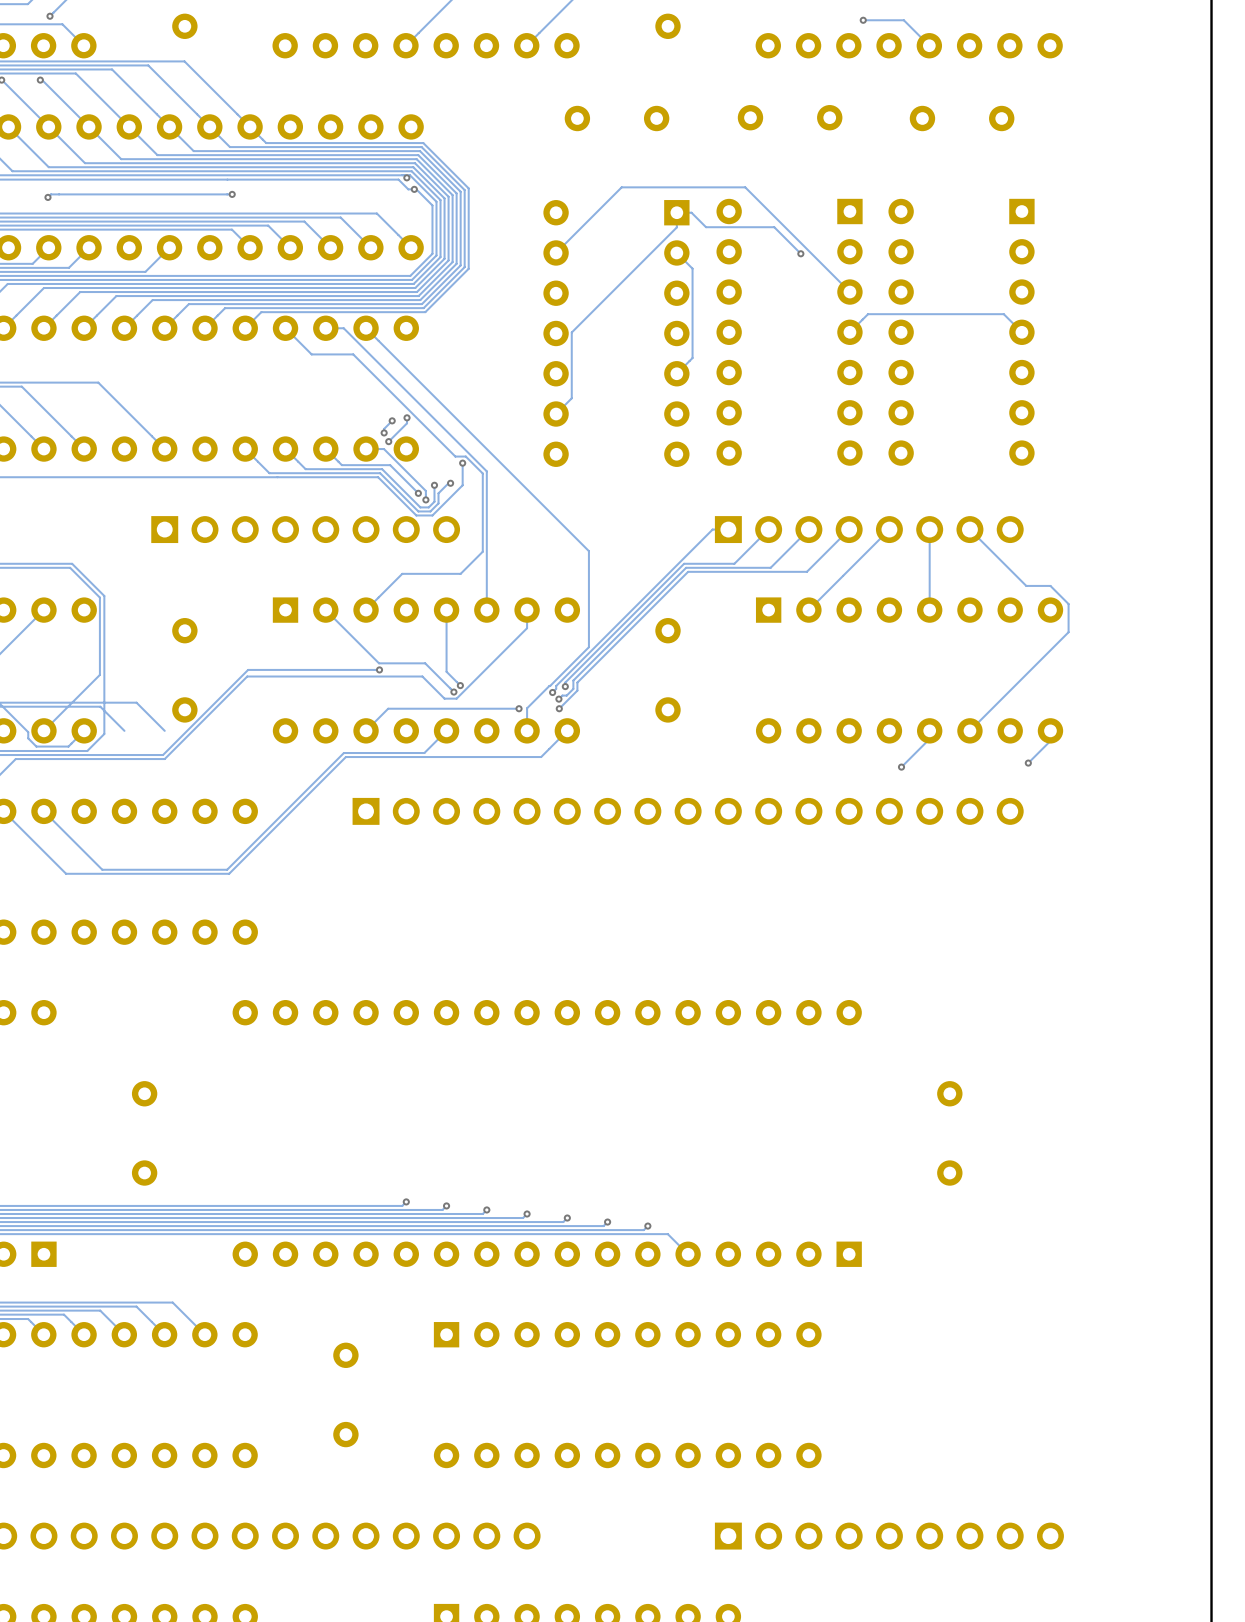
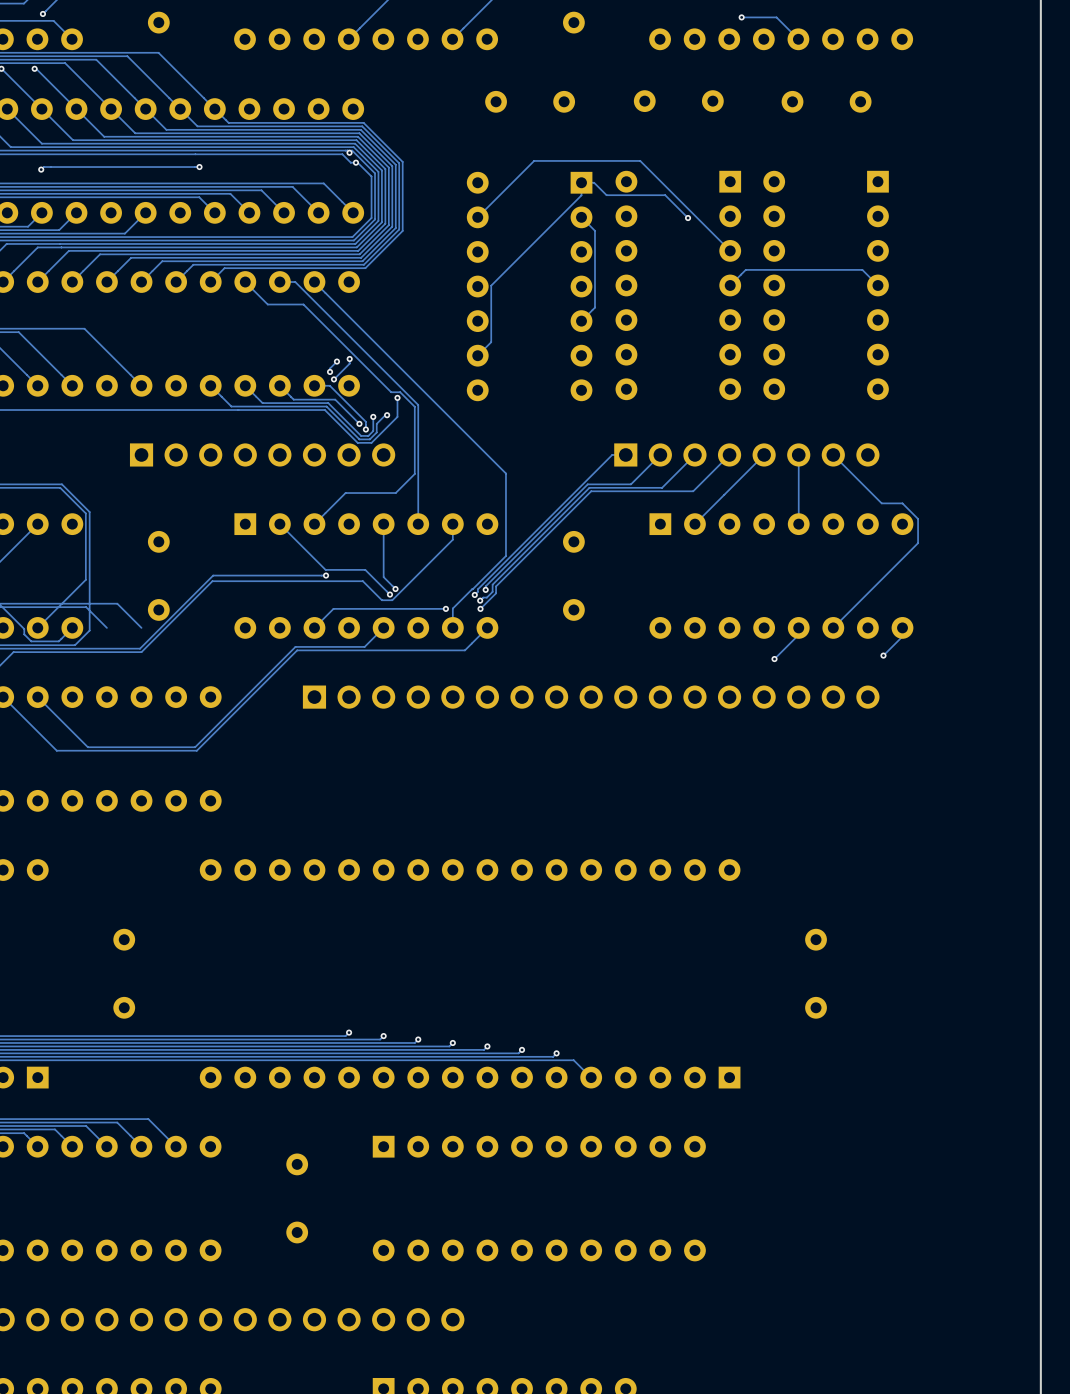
part: (889, 1536) -> none

